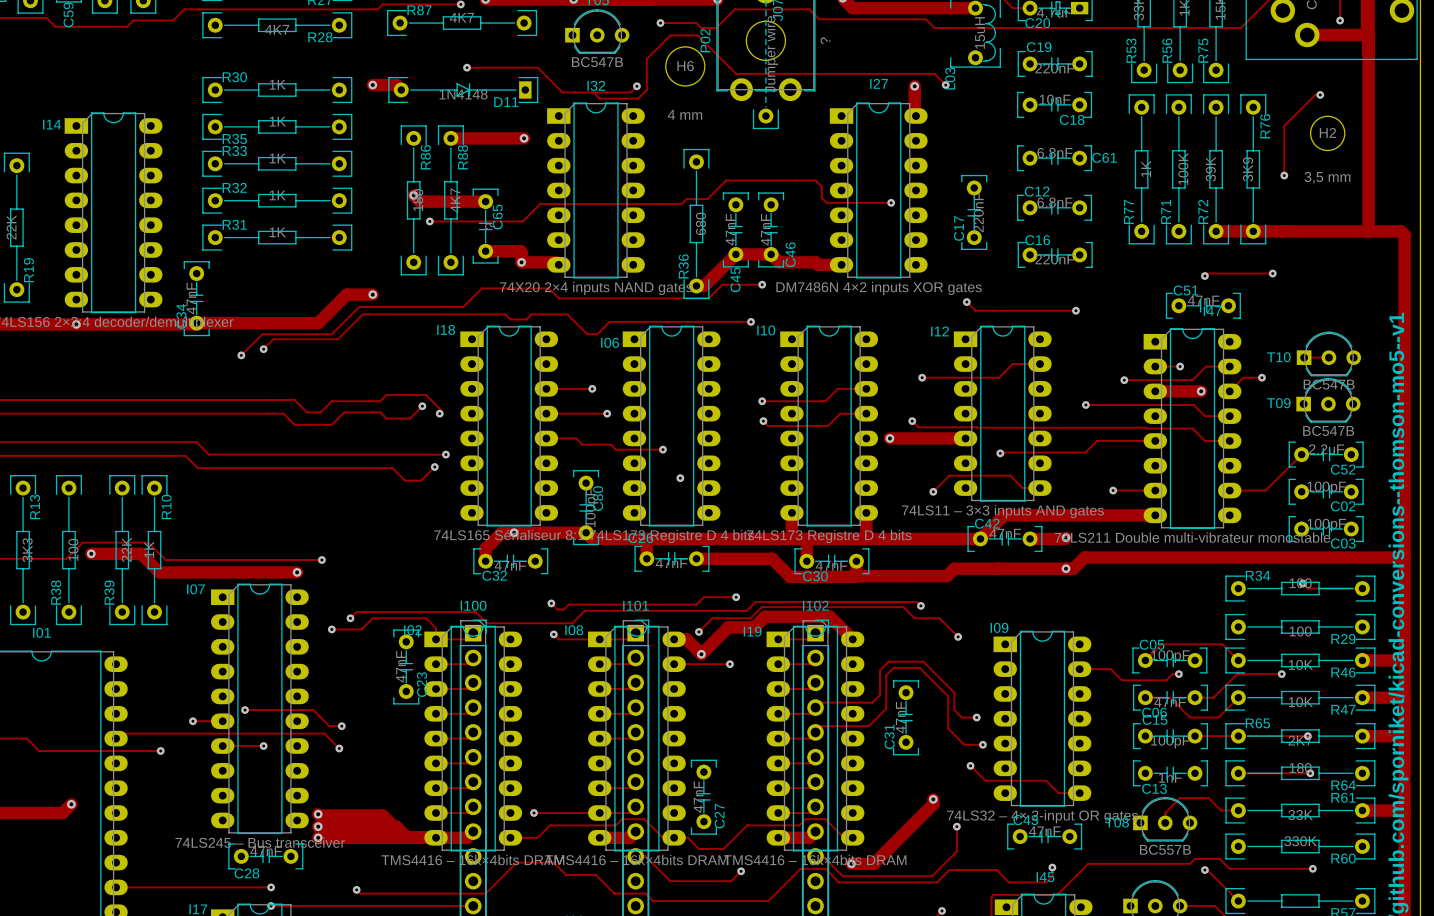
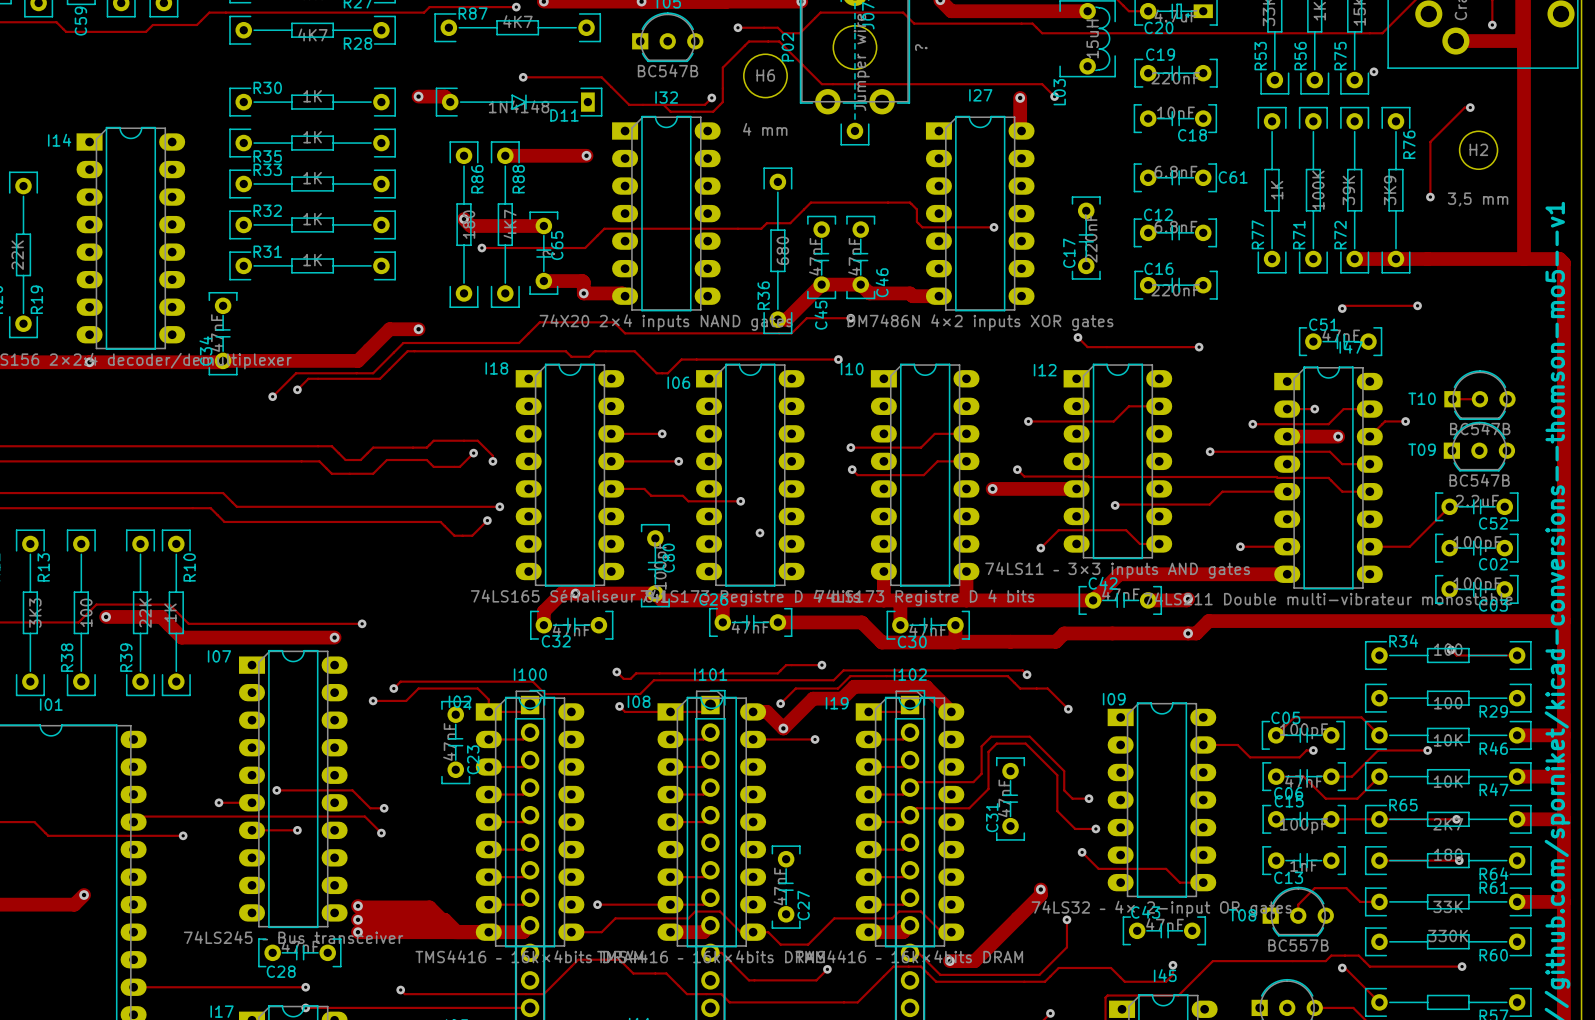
via: none -> (1373, 71)

